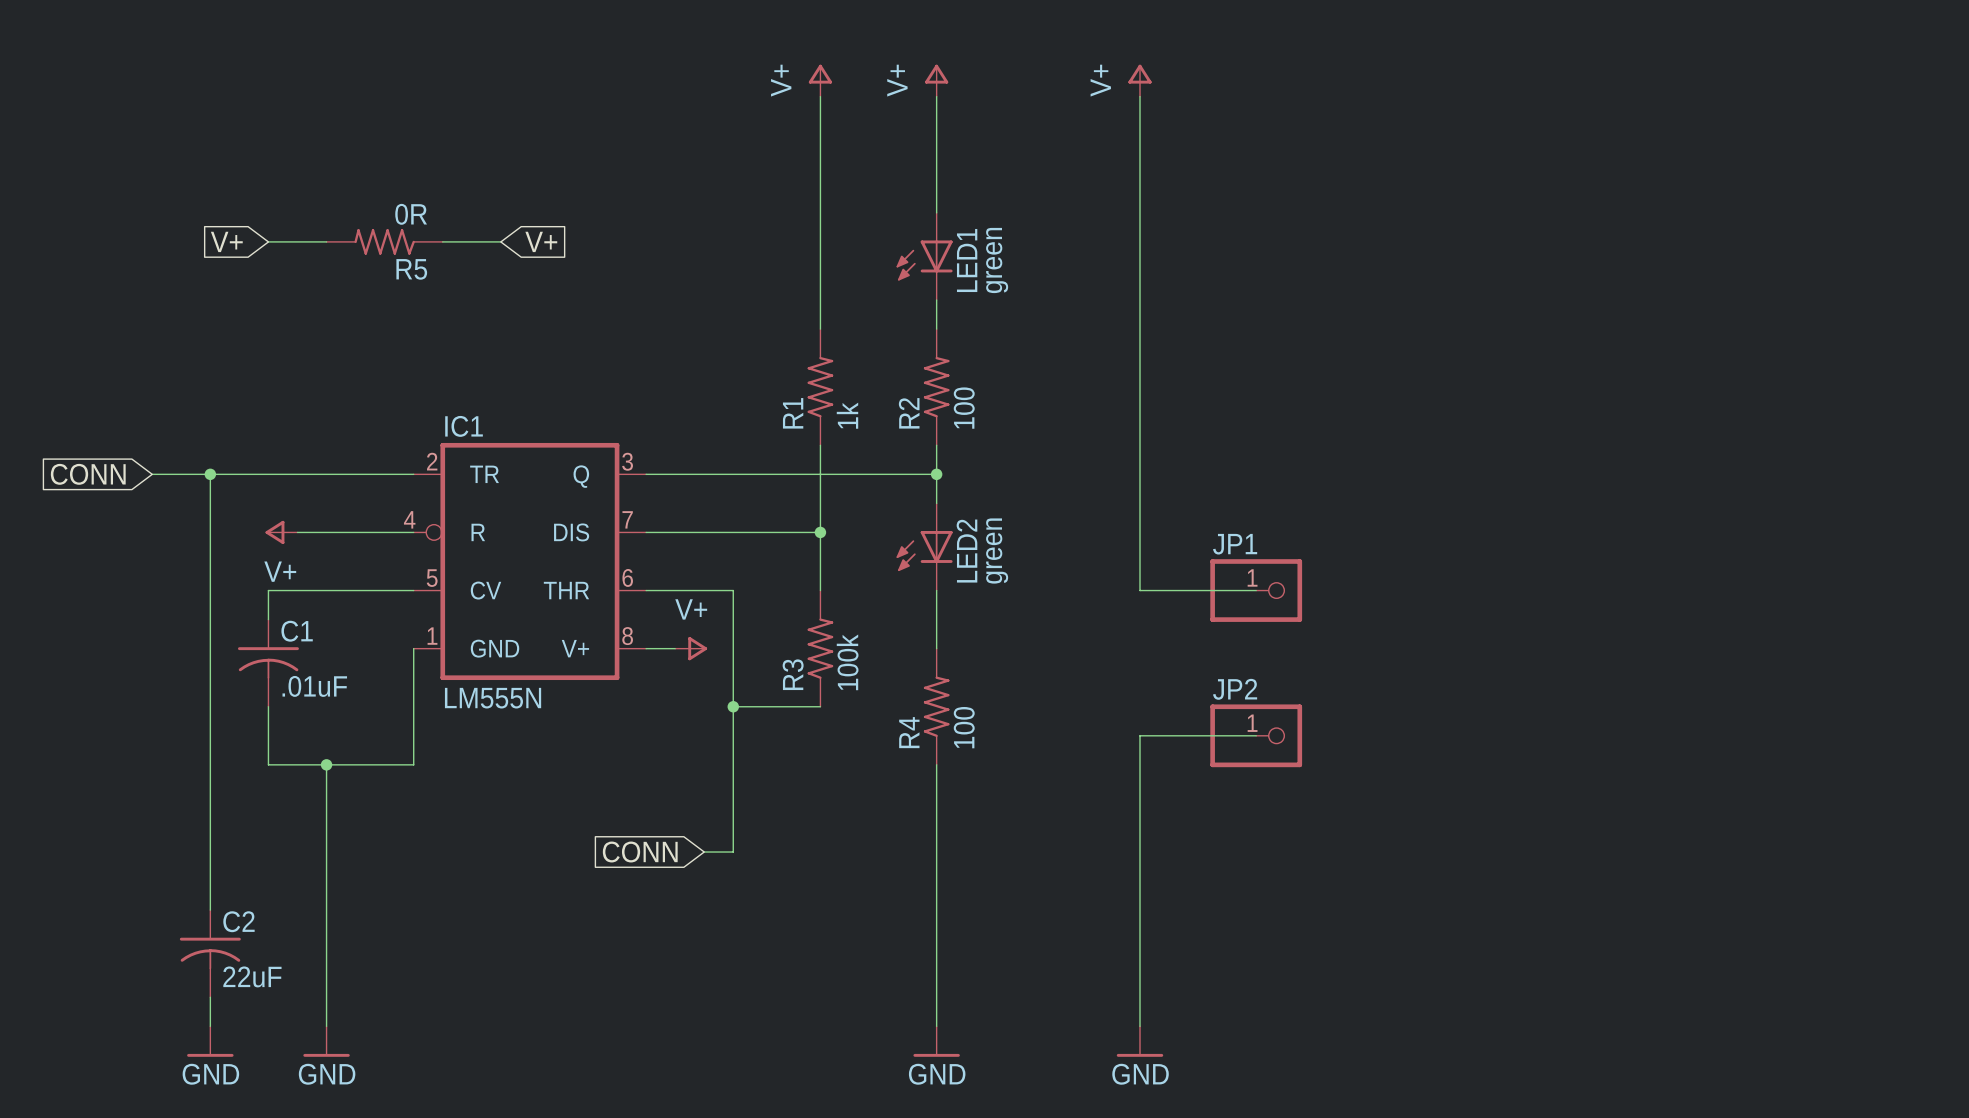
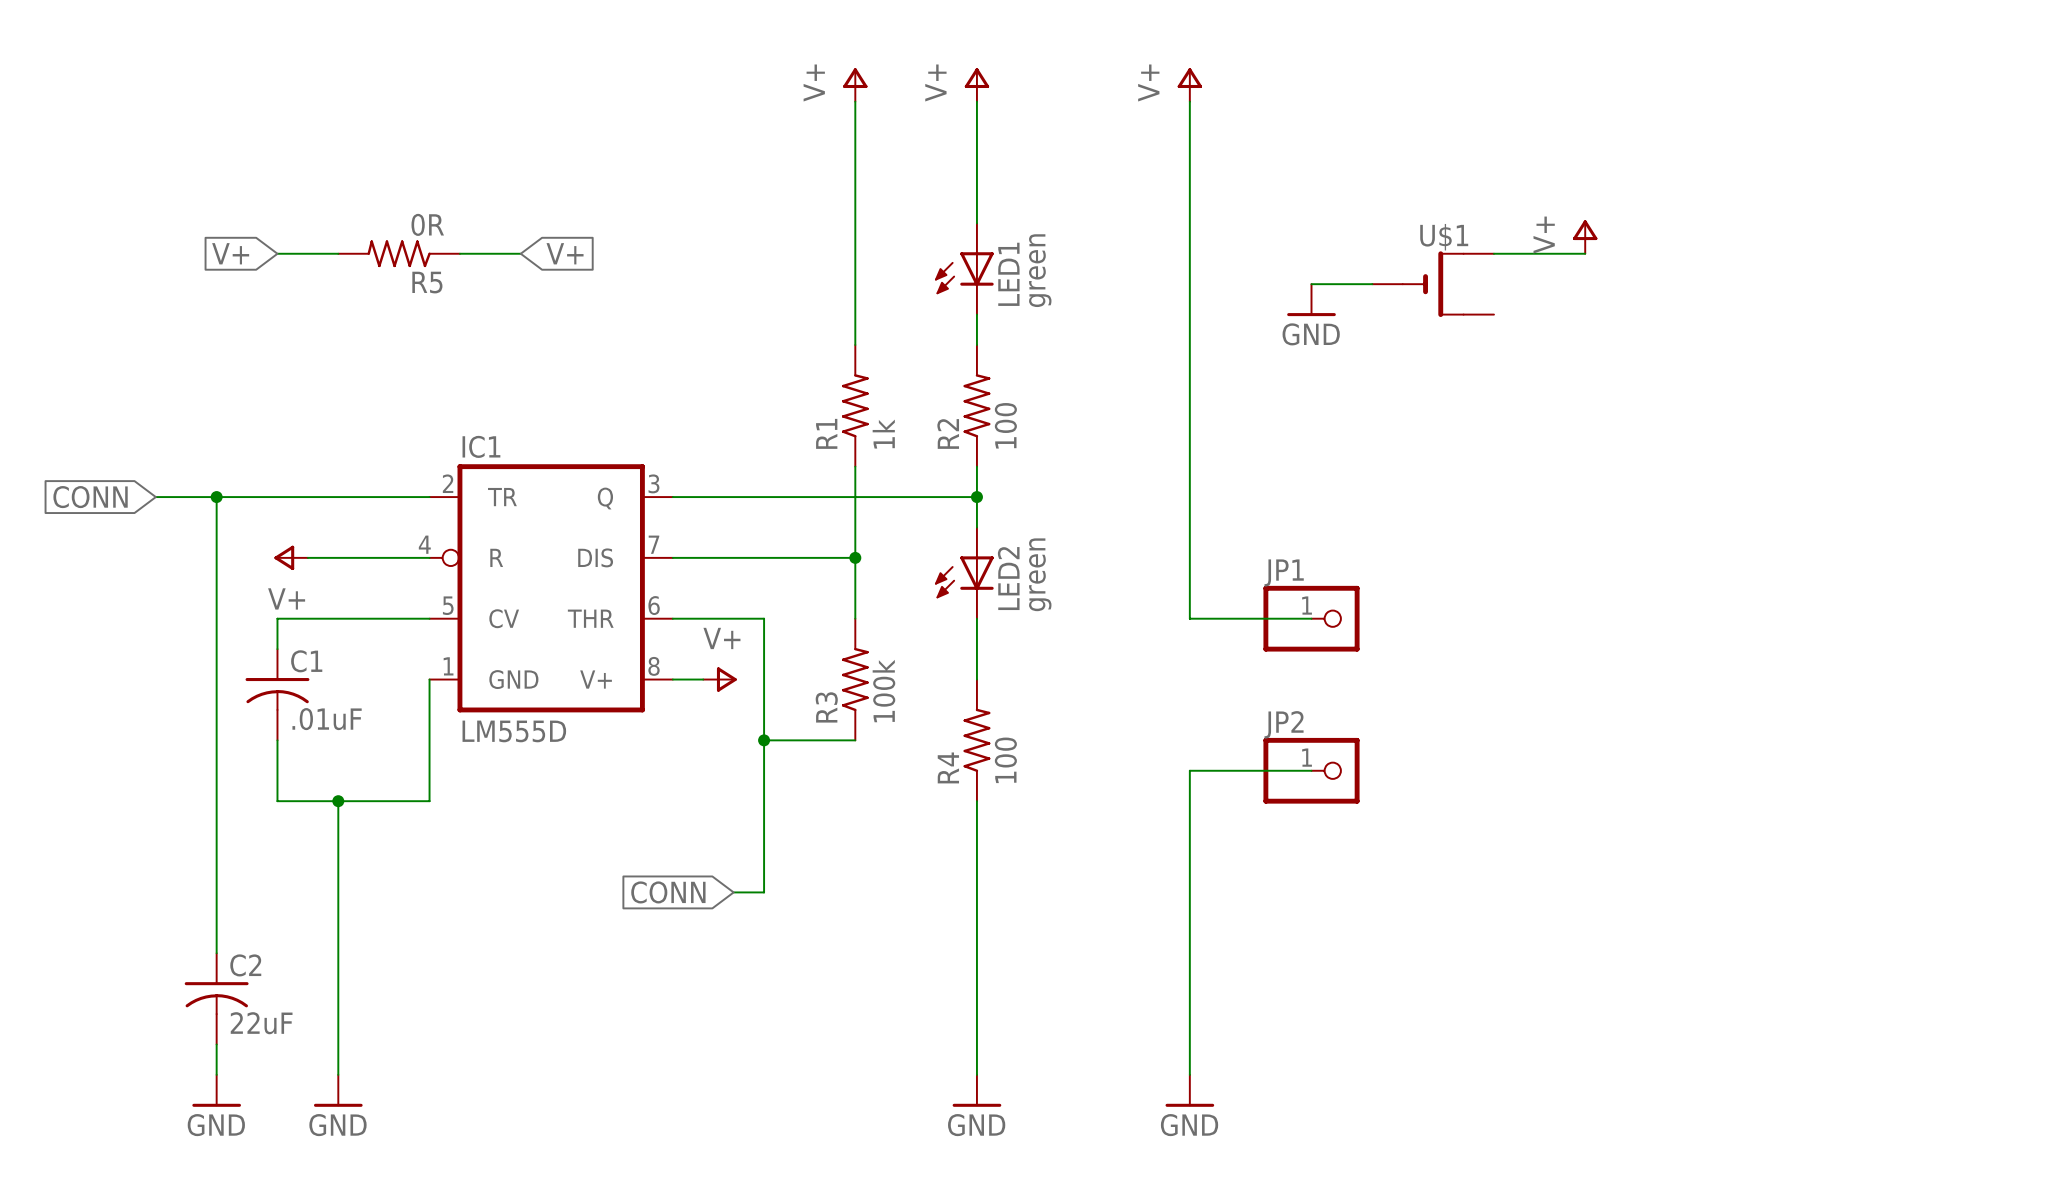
power symbol: none -> V+ (1585, 237)
wire: none -> (1493, 253) (1585, 253)
wire: none -> (1311, 284) (1372, 284)
U$1: none -> (1433, 284)
power symbol: none -> GND (1311, 300)
IC1 value: LM555N (493, 698) -> LM555D (514, 731)

